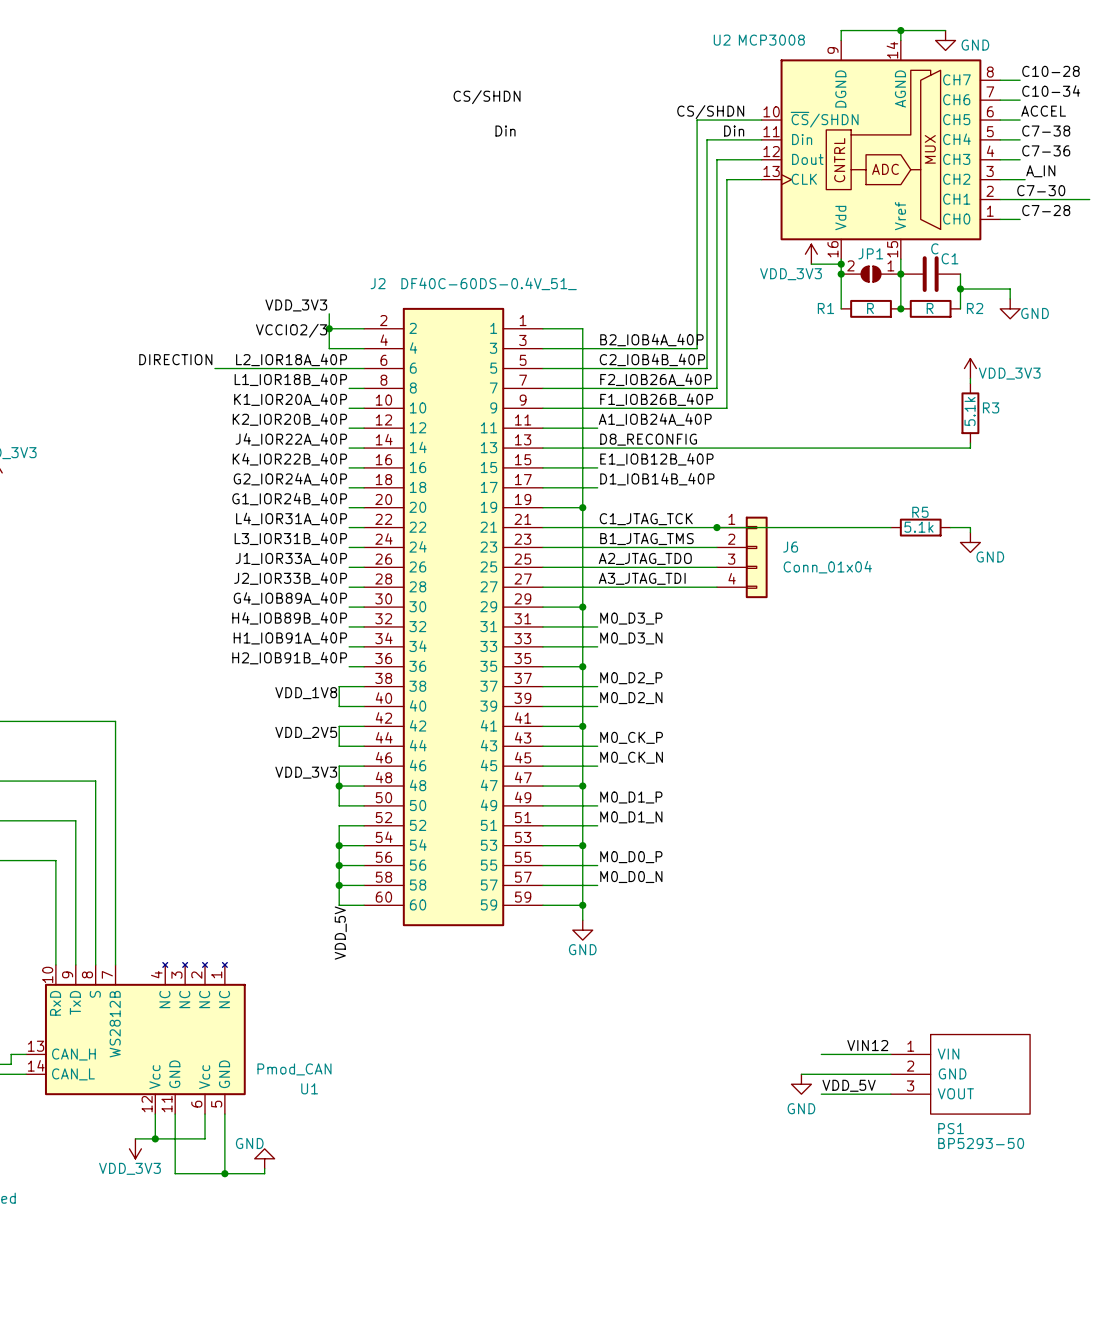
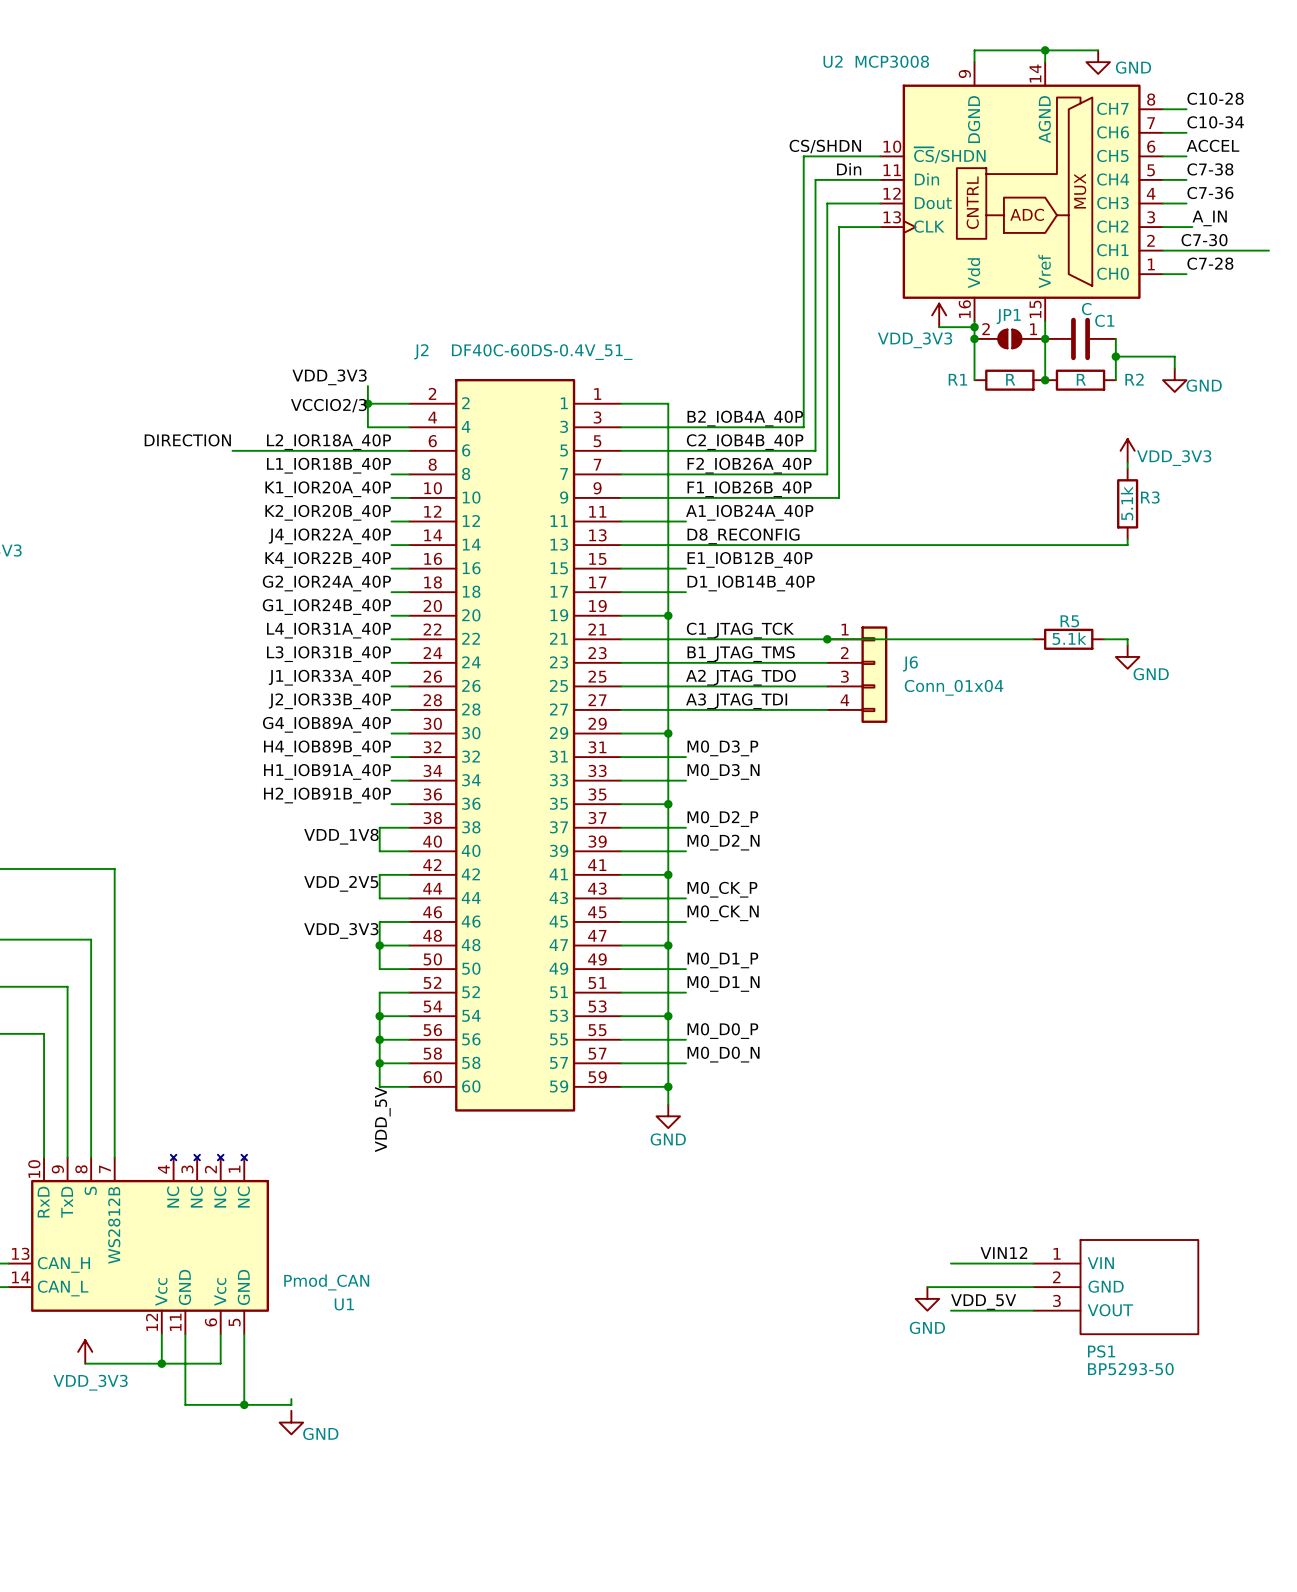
label: CS/SHDN (487, 97) -> none
label: Din (505, 131) -> none
wire: none -> (85, 1363) (138, 1363)
power symbol rotation: 0° (135, 1148) -> 180° (85, 1351)
power symbol position: VDD_3V3 (135, 1148) -> VDD_3V3 (85, 1351)
power symbol rotation: 0° (264, 1158) -> 180° (291, 1422)
power symbol position: GND (264, 1158) -> GND (291, 1422)

